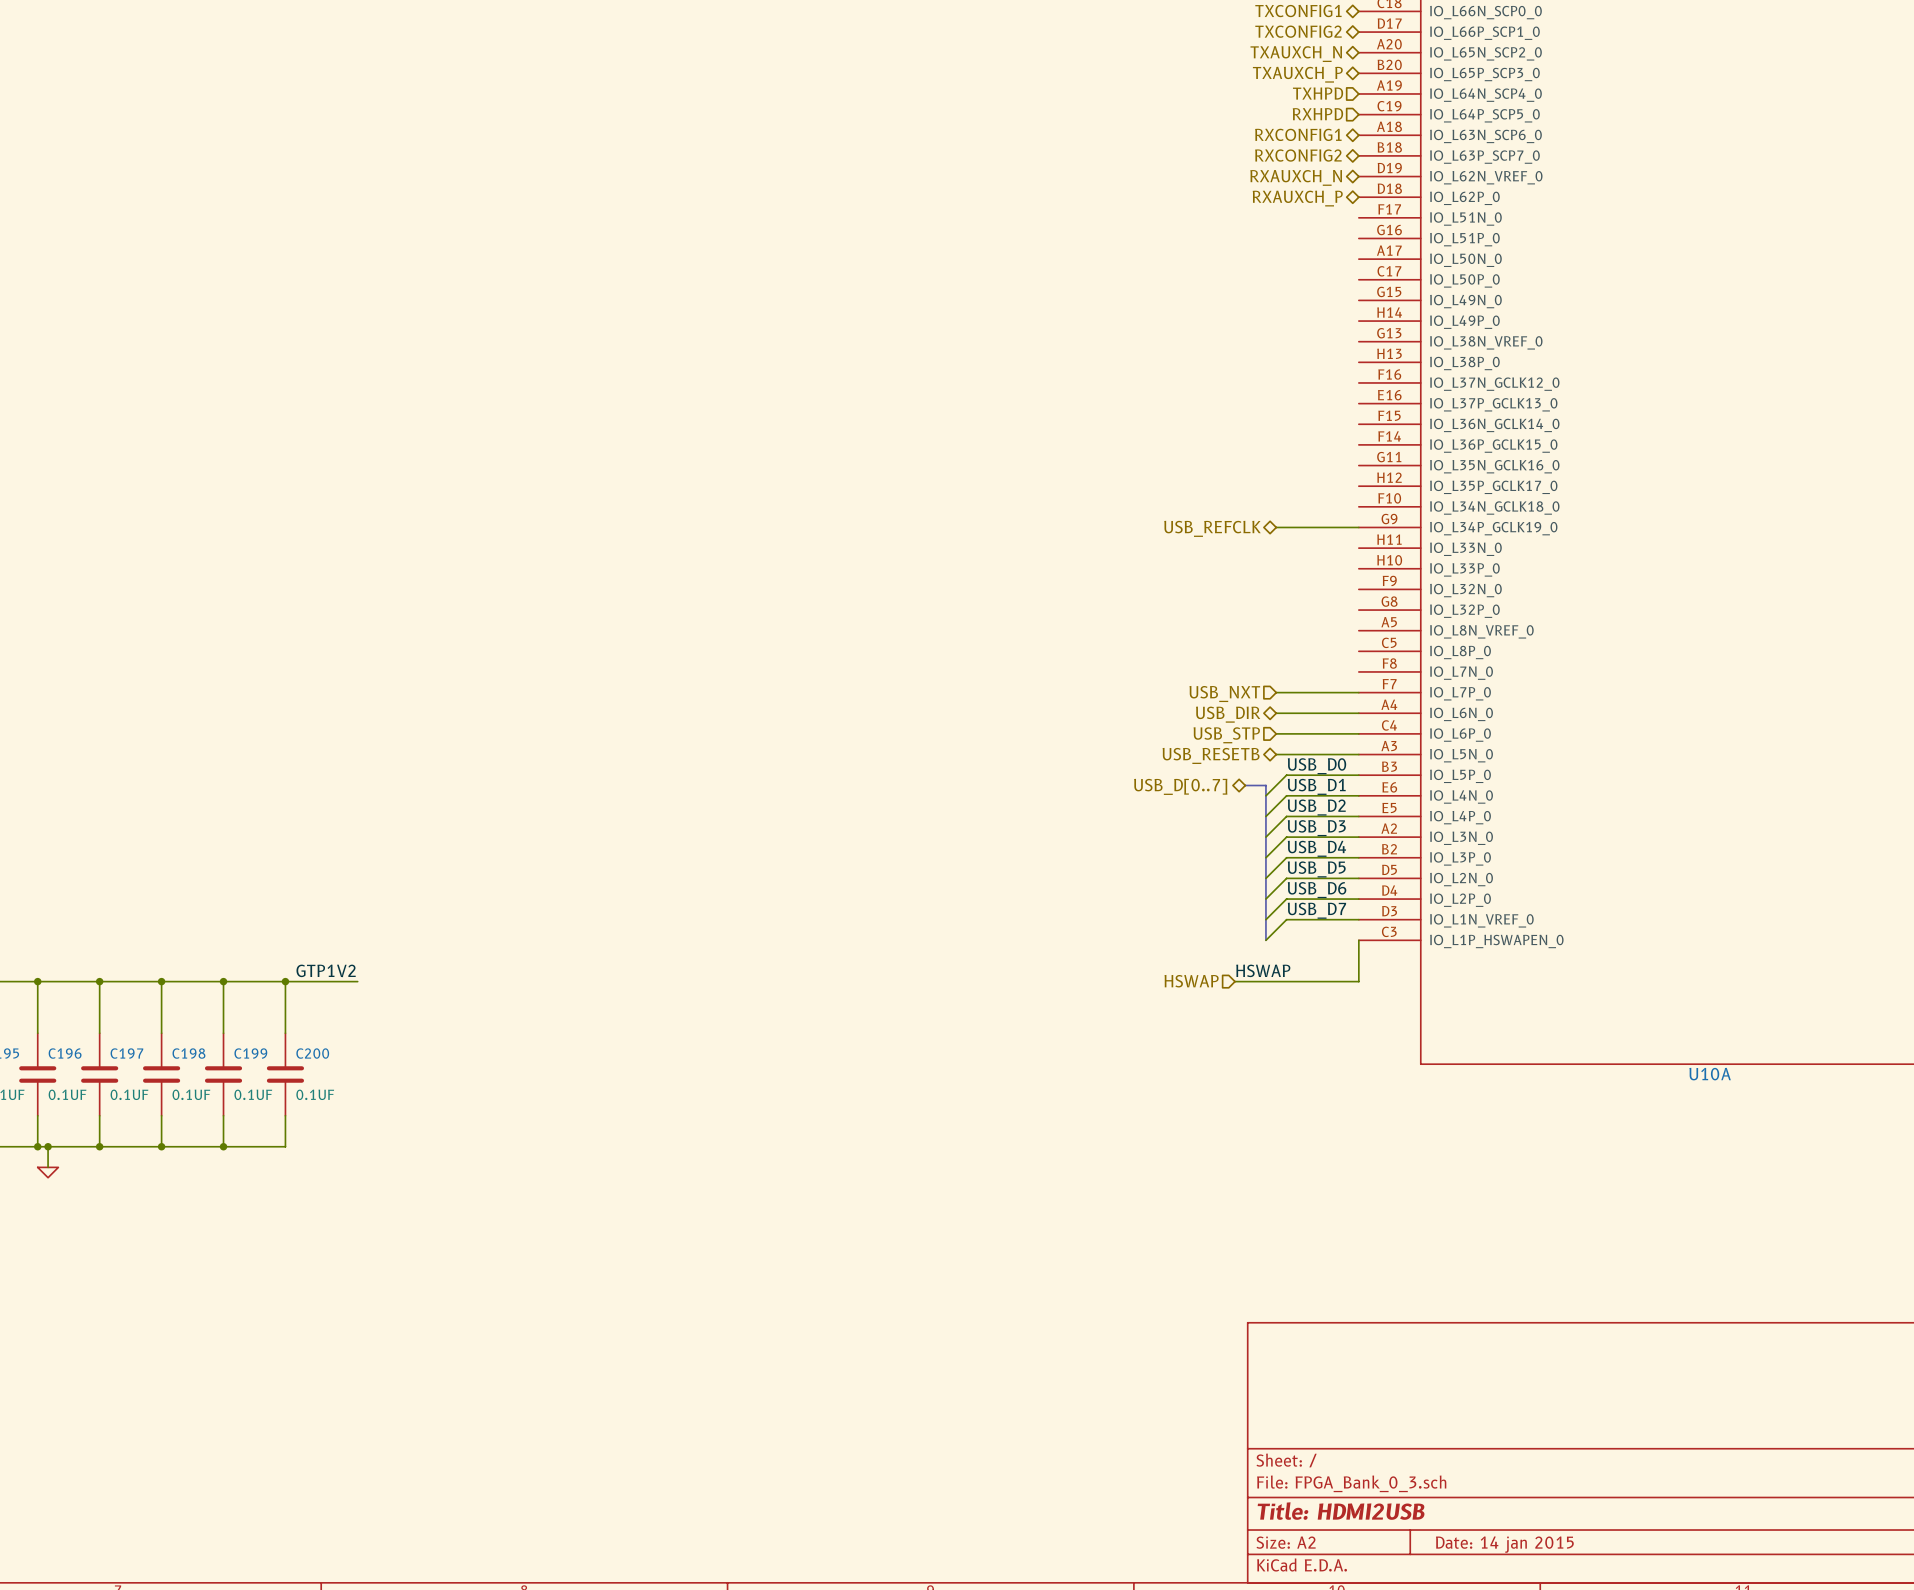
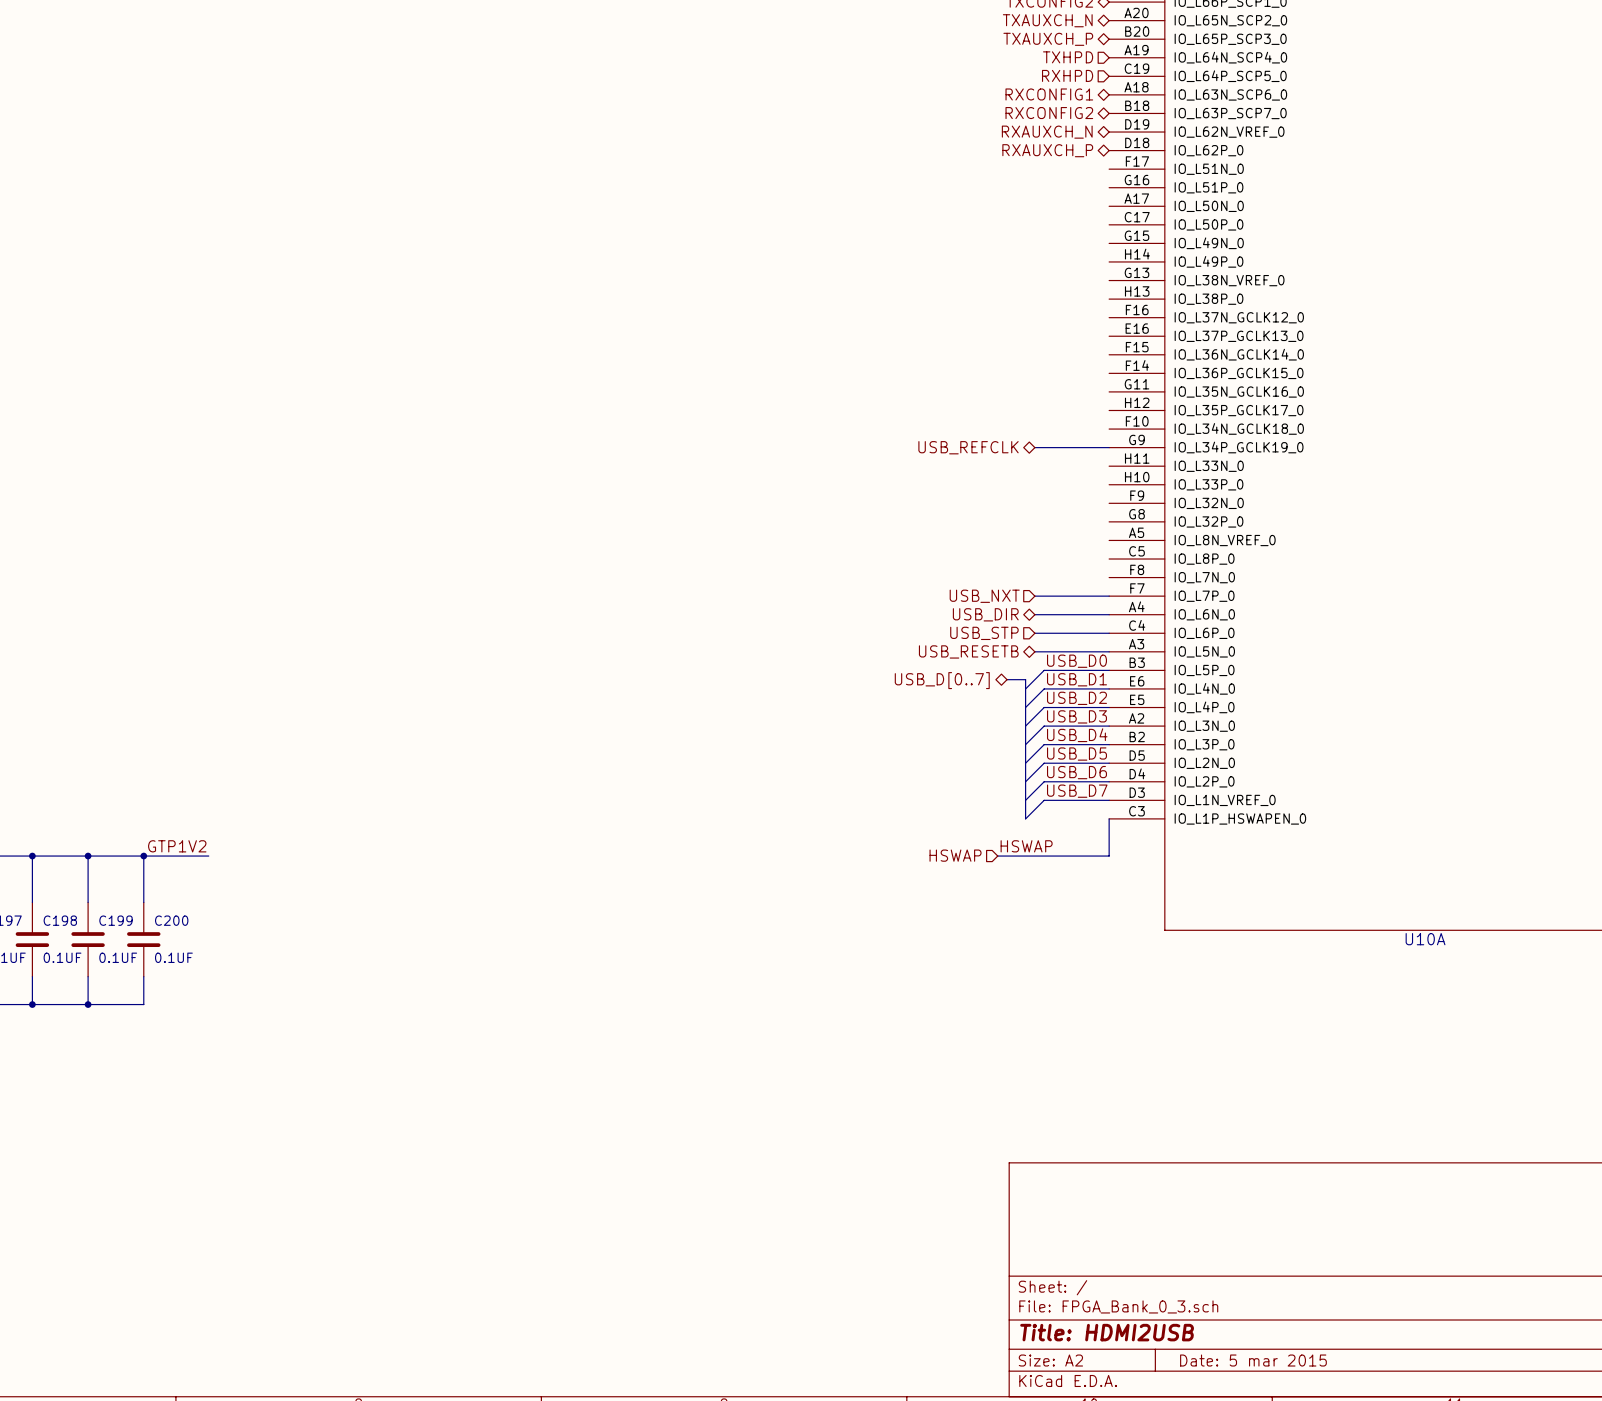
title block: Date: 14 jan 2015 (1504, 1544) -> Date: 5 mar 2015 (1253, 1360)

